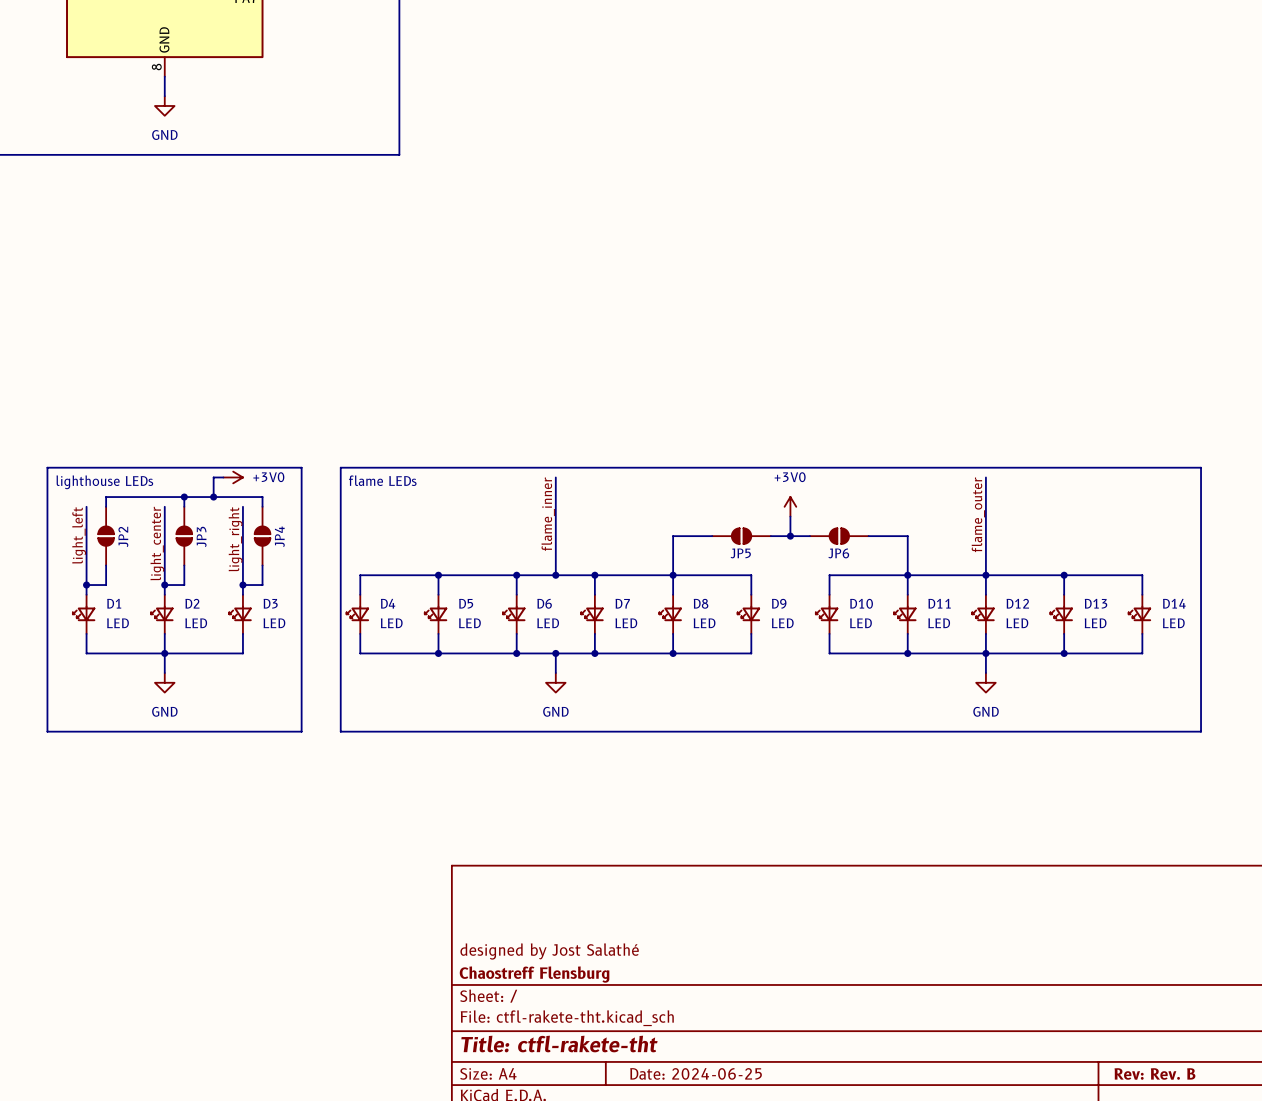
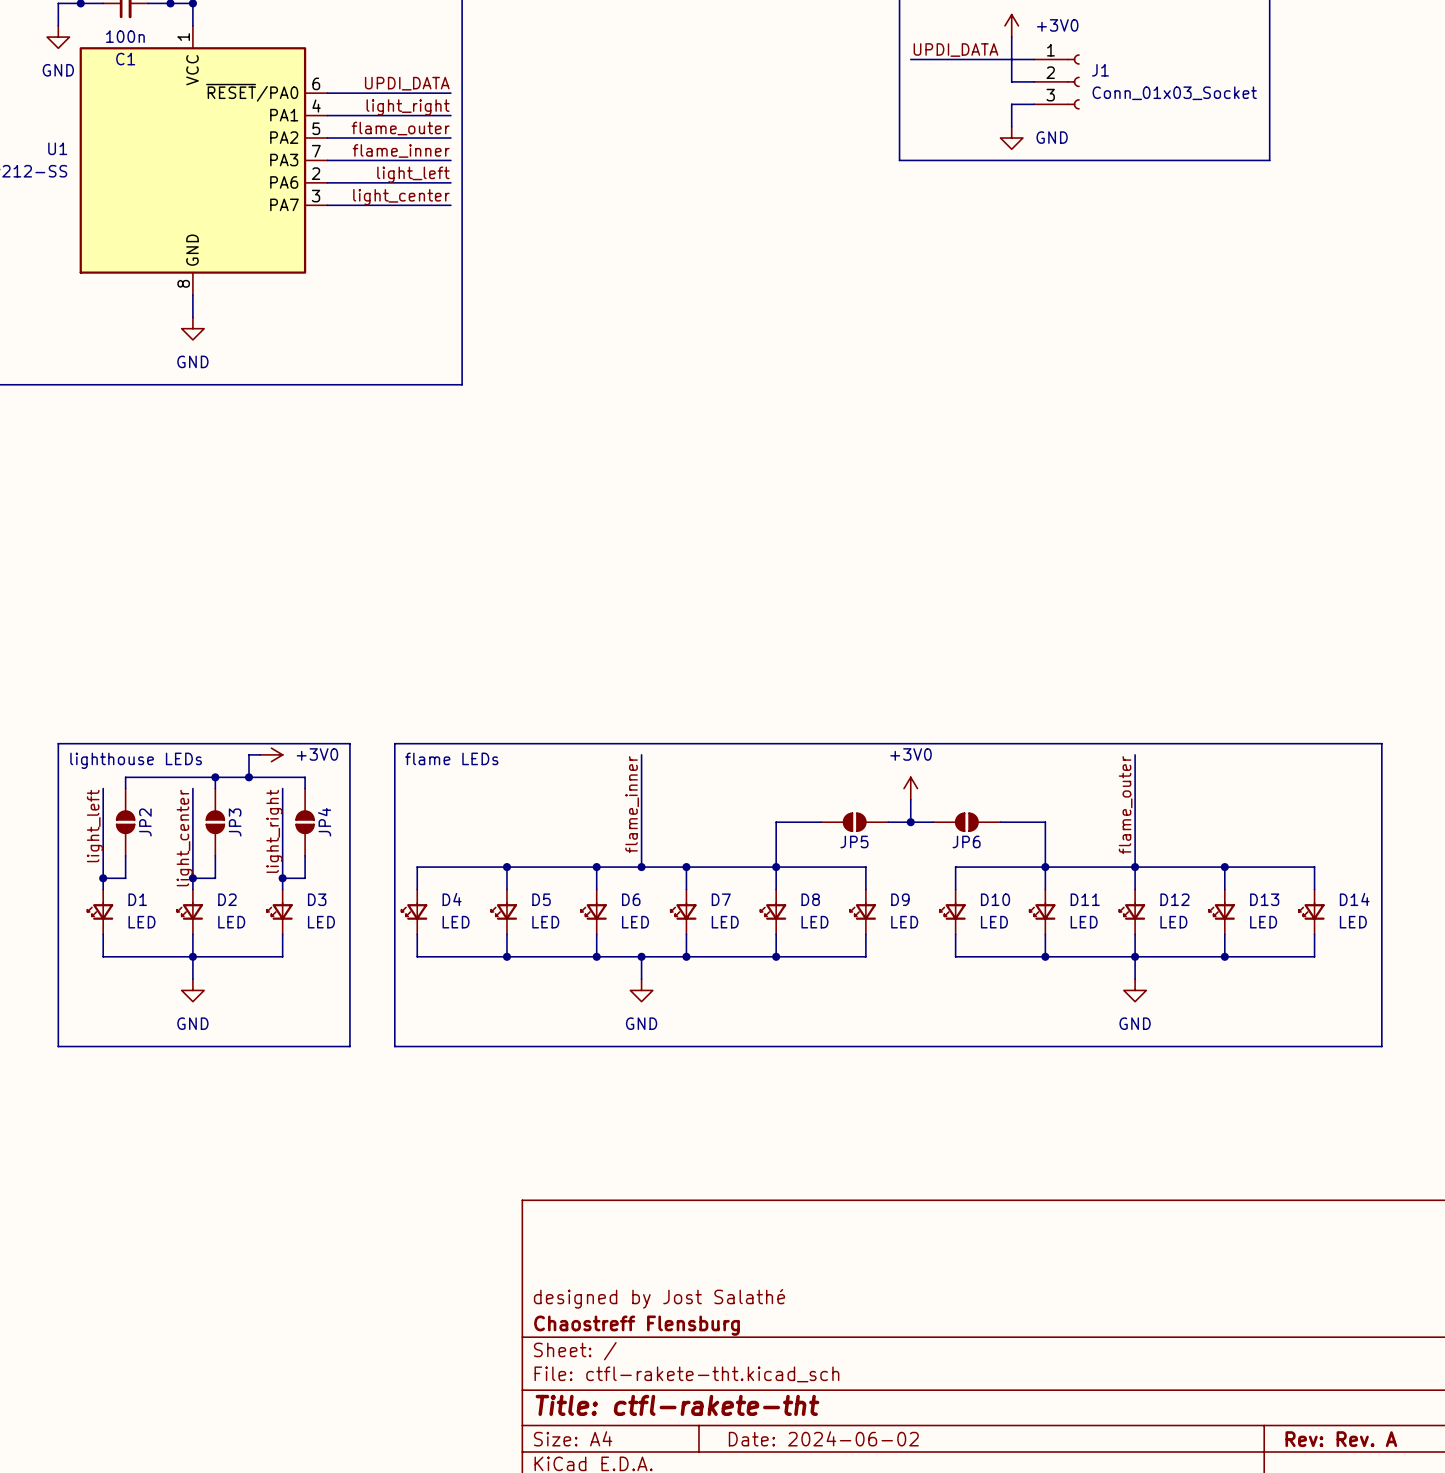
title block: Date: 2024-06-25 (696, 1073) -> Date: 2024-06-02 (823, 1438)
title block: Rev: Rev. B (1154, 1074) -> Rev: Rev. A (1341, 1439)

